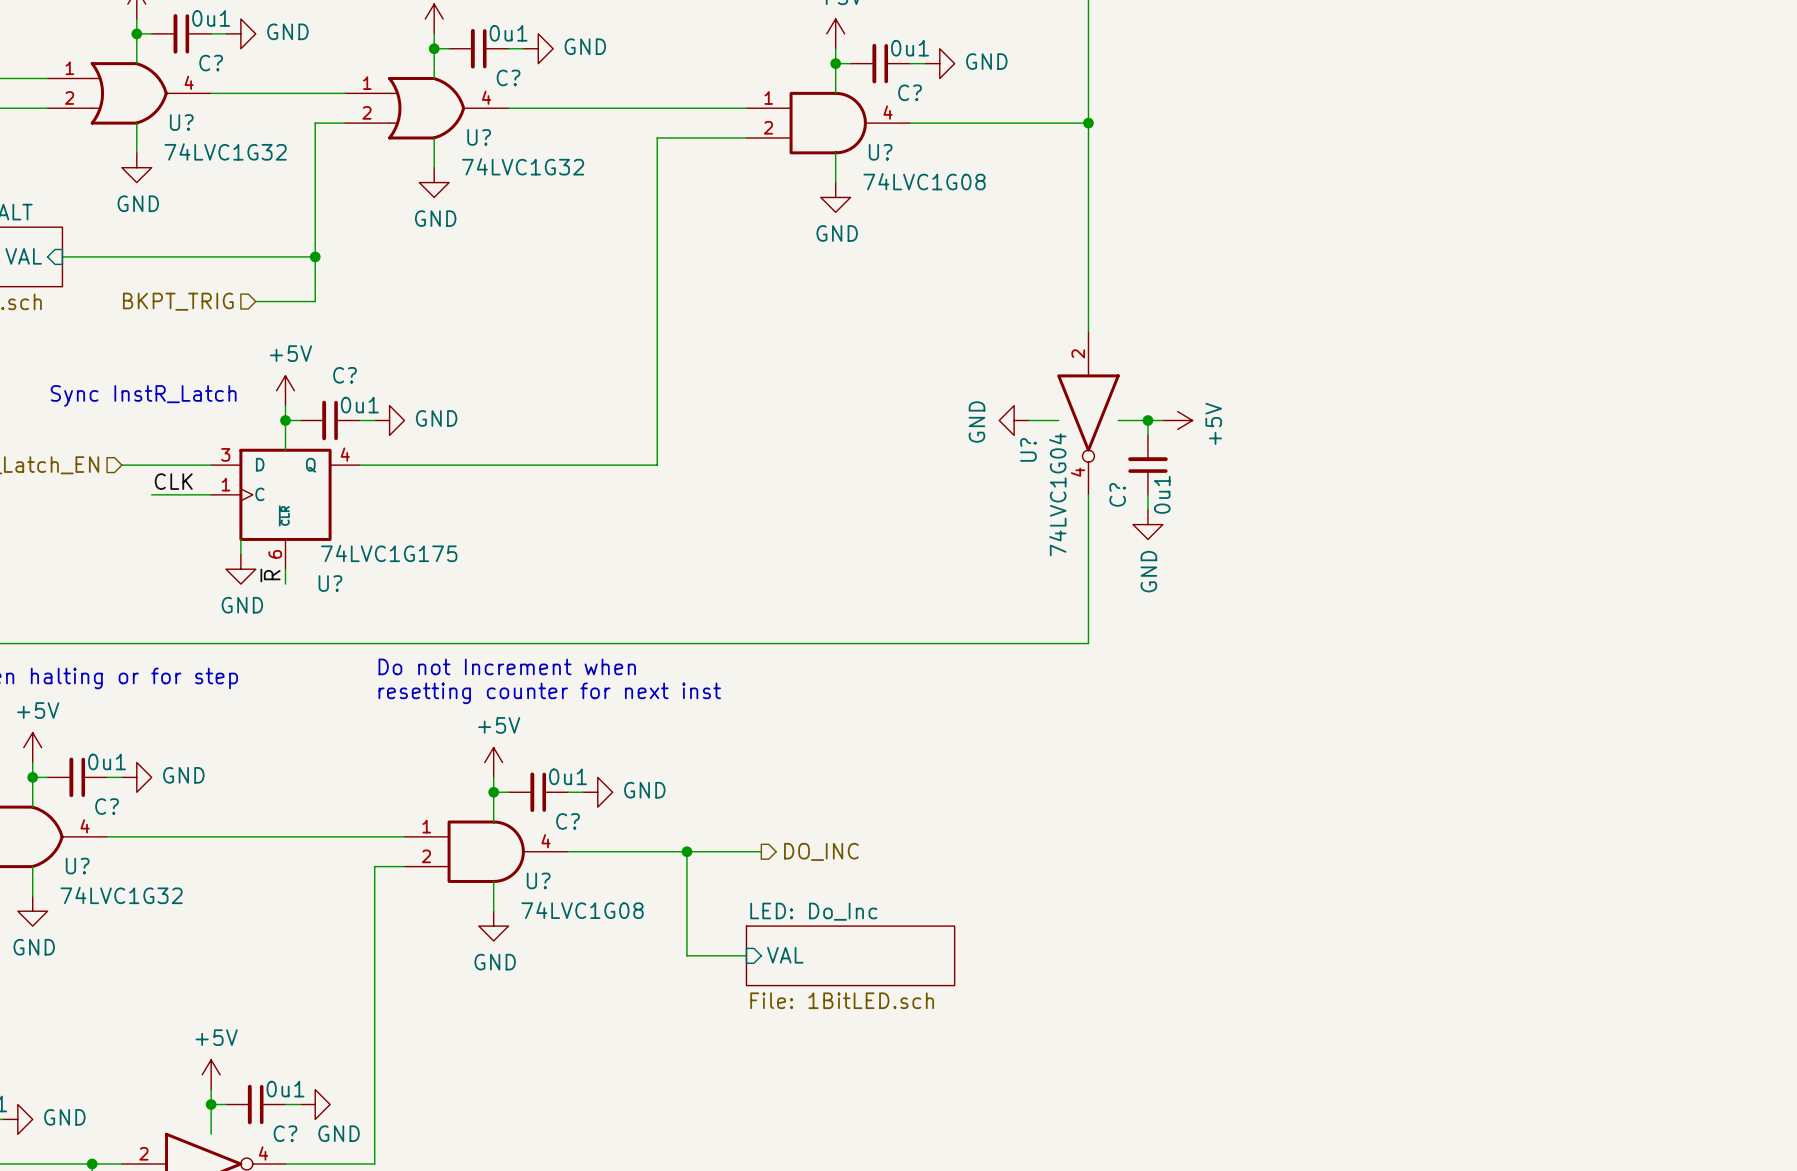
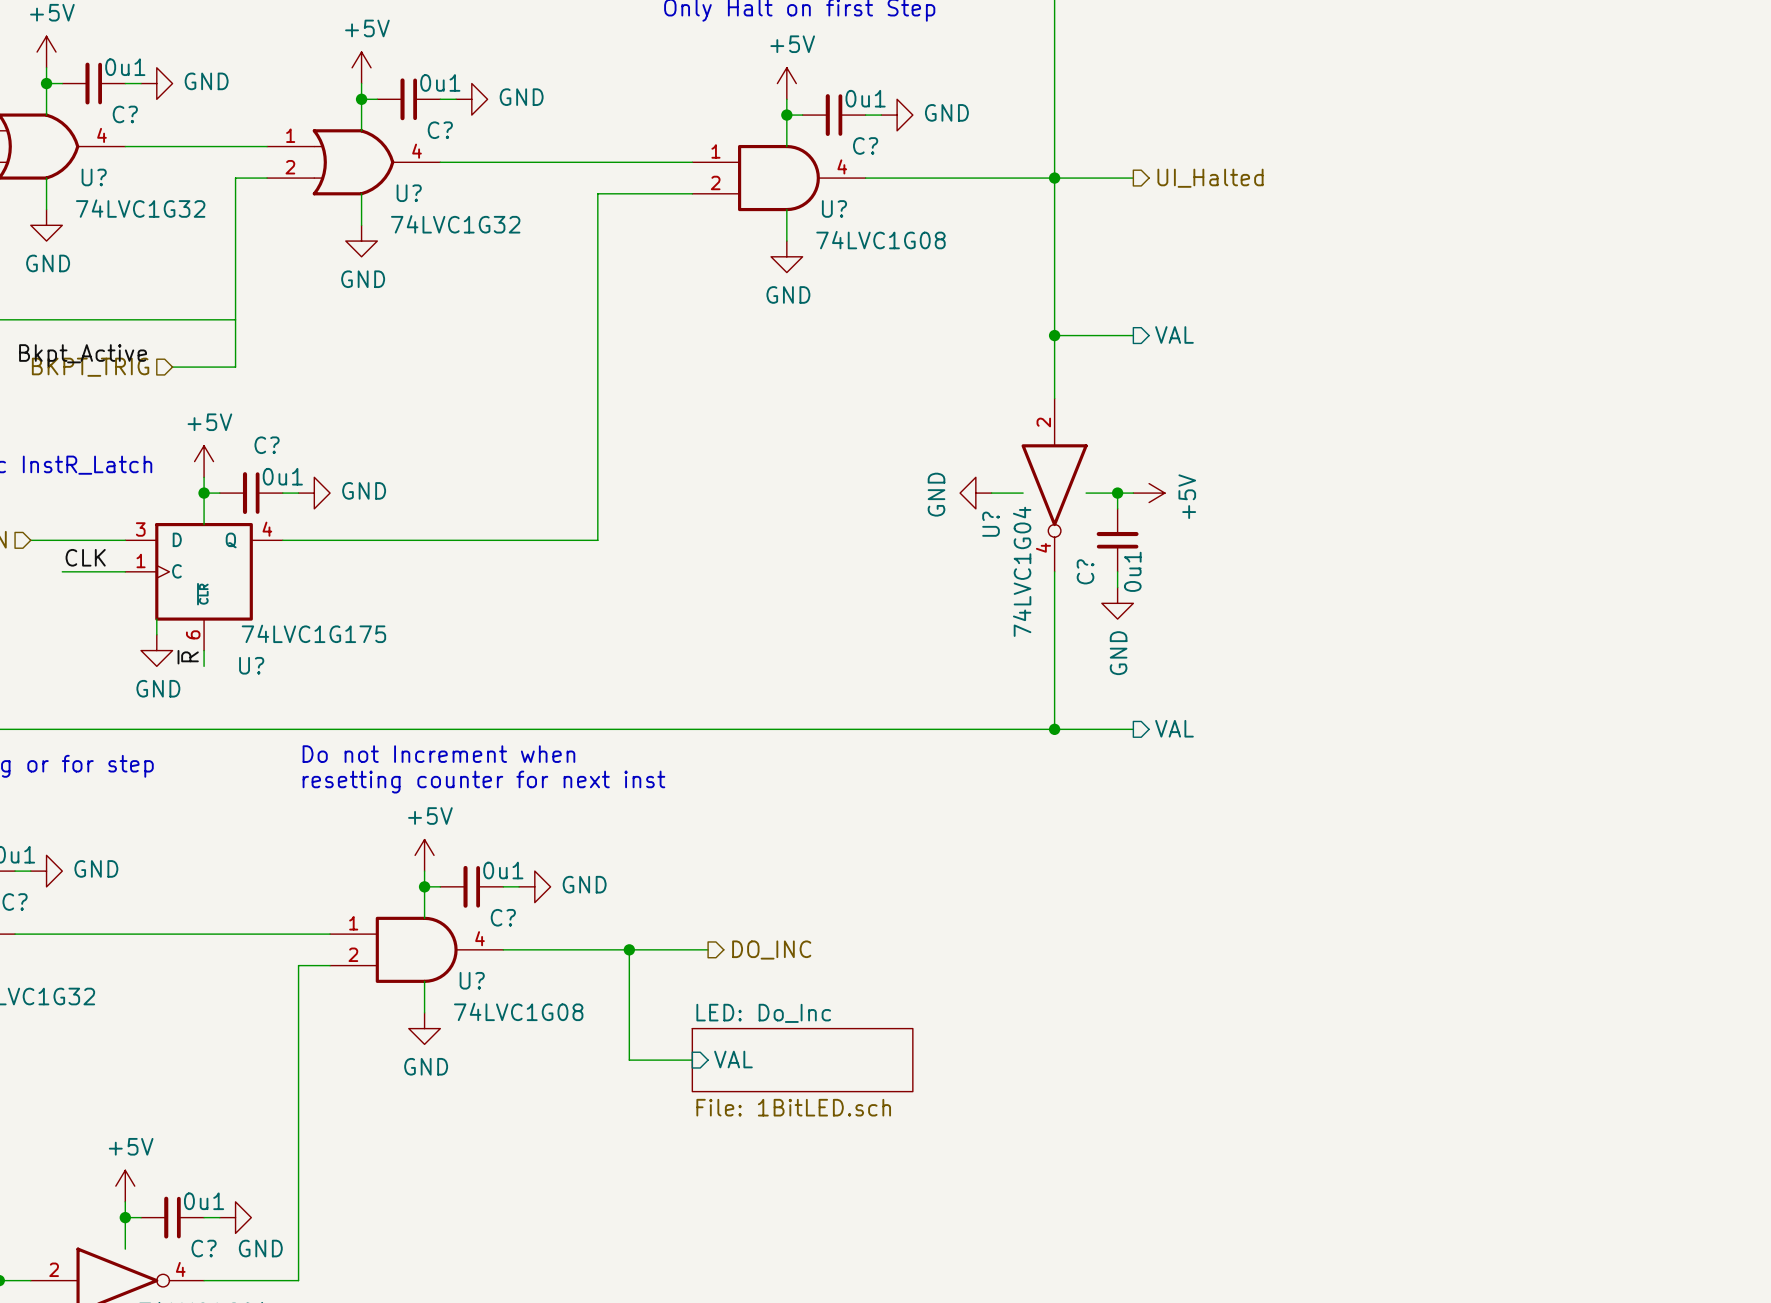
wire: none -> (1054, 178) (1133, 178)
hierarchical label: none -> UI_Halted (1210, 178)
junction: (315, 256) -> none
wire: none -> (1054, 335) (1133, 335)
junction: none -> (1054, 335)
sheet pin: none -> VAL (1174, 334)
label: none -> Bkpt_Active (83, 355)
wire: none -> (1054, 729) (1133, 729)
junction: none -> (1054, 729)
sheet pin: none -> VAL (1174, 728)

